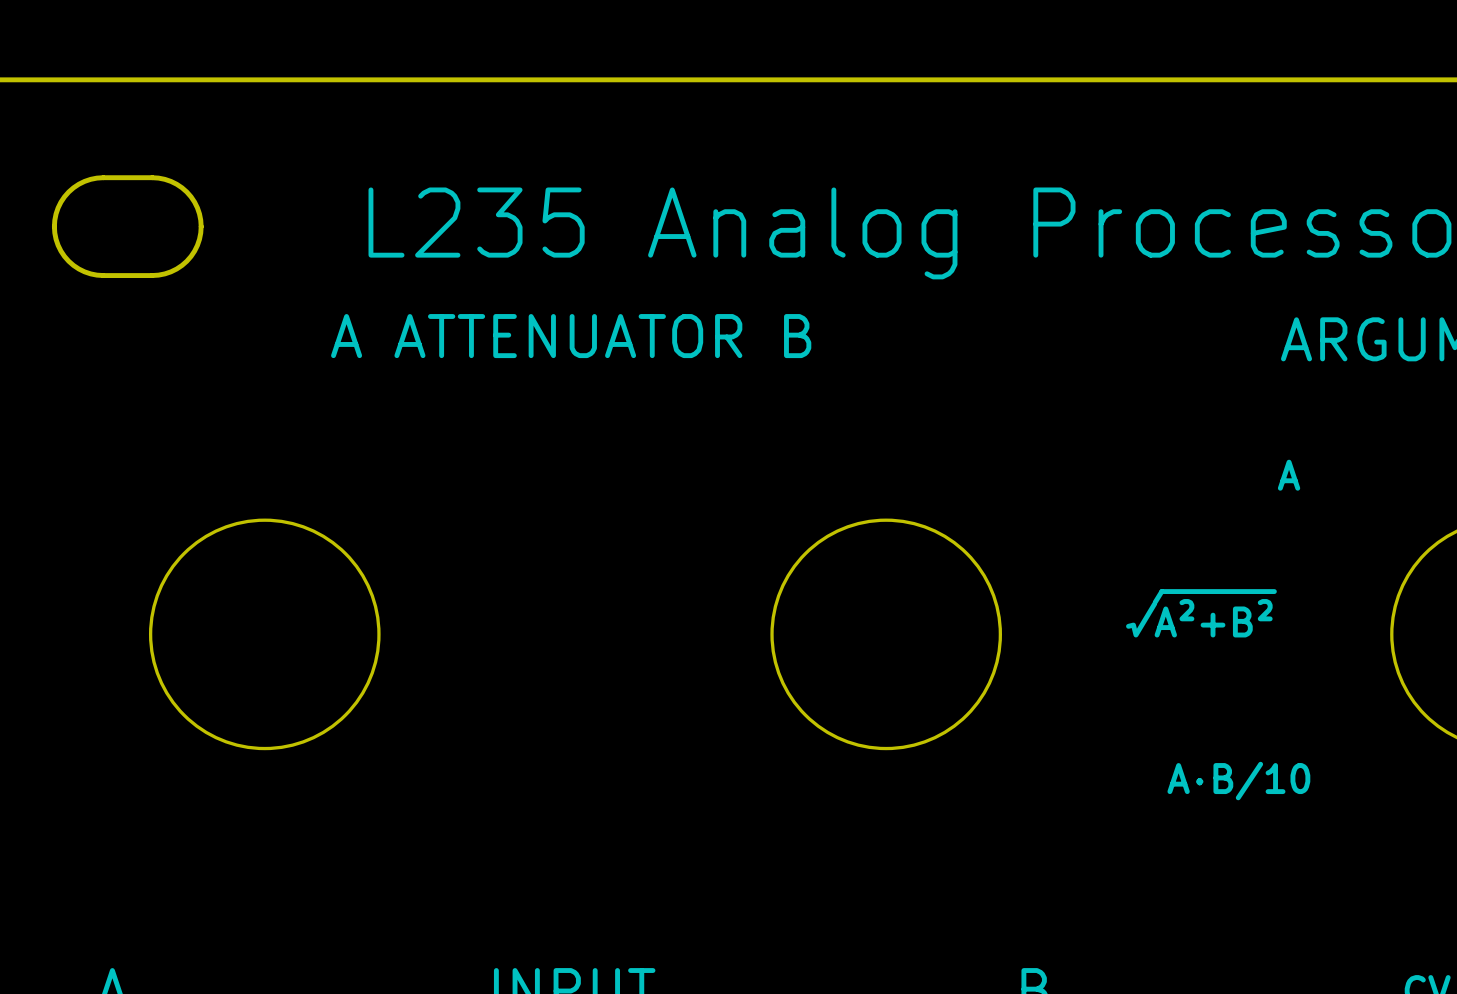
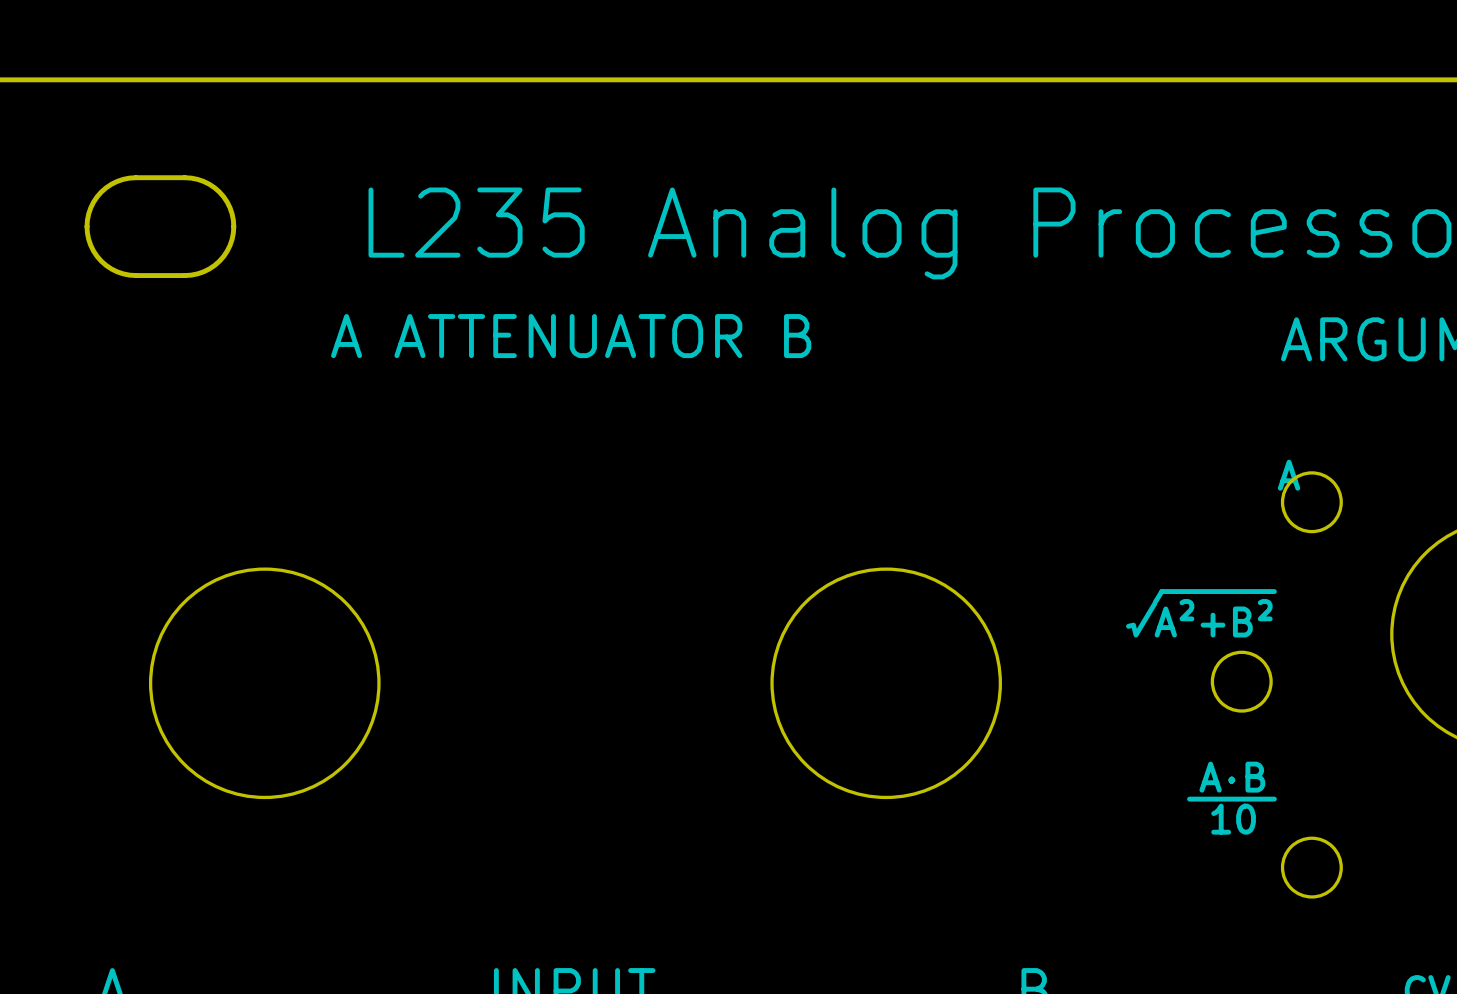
board edge: (135, 177) (96, 178) (78, 184) (68, 192) (60, 202) (56, 213) (54, 226) (56, 239) (60, 251) (68, 261) (78, 268) (96, 275) (135, 275) -> (135, 177) (117, 181) (101, 192) (90, 207) (87, 226) (90, 245) (101, 261) (117, 271) (135, 275)
board edge: (152, 177) (170, 181) (186, 192) (197, 207) (201, 226) (197, 245) (186, 261) (170, 271) (152, 275) -> (152, 177) (191, 178) (209, 184) (219, 192) (227, 202) (232, 213) (233, 226) (232, 239) (227, 251) (219, 261) (209, 268) (191, 275) (152, 275)
round board edge: none -> [1280, 471, 1343, 534]
round board edge position: (264, 634) -> (264, 683)
round board edge position: (886, 634) -> (886, 683)
round board edge: none -> [1210, 650, 1273, 713]
text: A·B/10 (1238, 781) -> A·B (1232, 777)
line: none -> (1189, 799) (1274, 799)
text: none -> 10 (1233, 819)
round board edge: none -> [1280, 836, 1343, 899]

